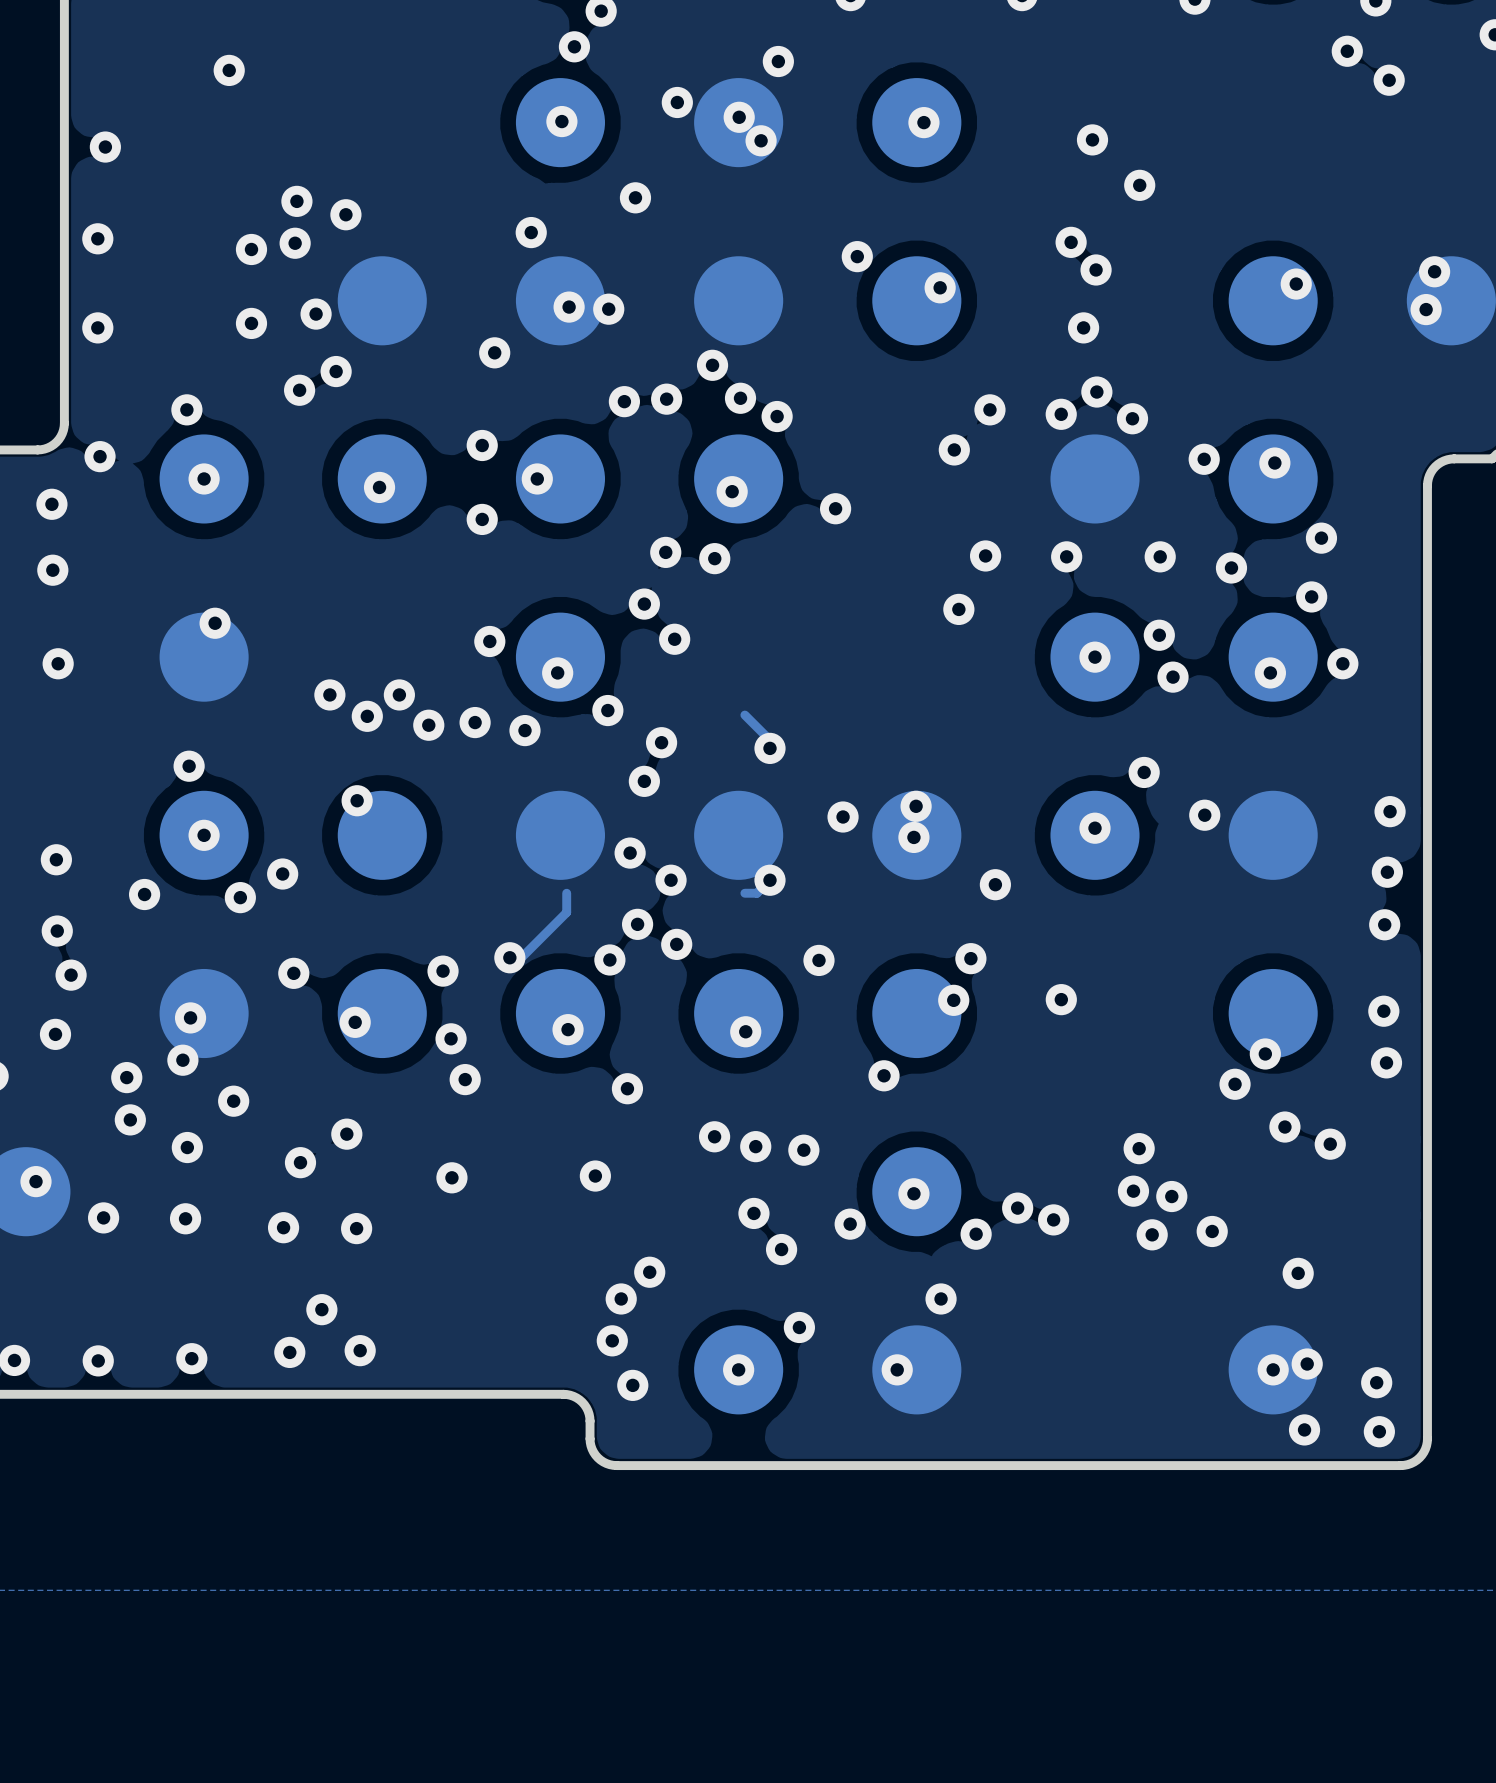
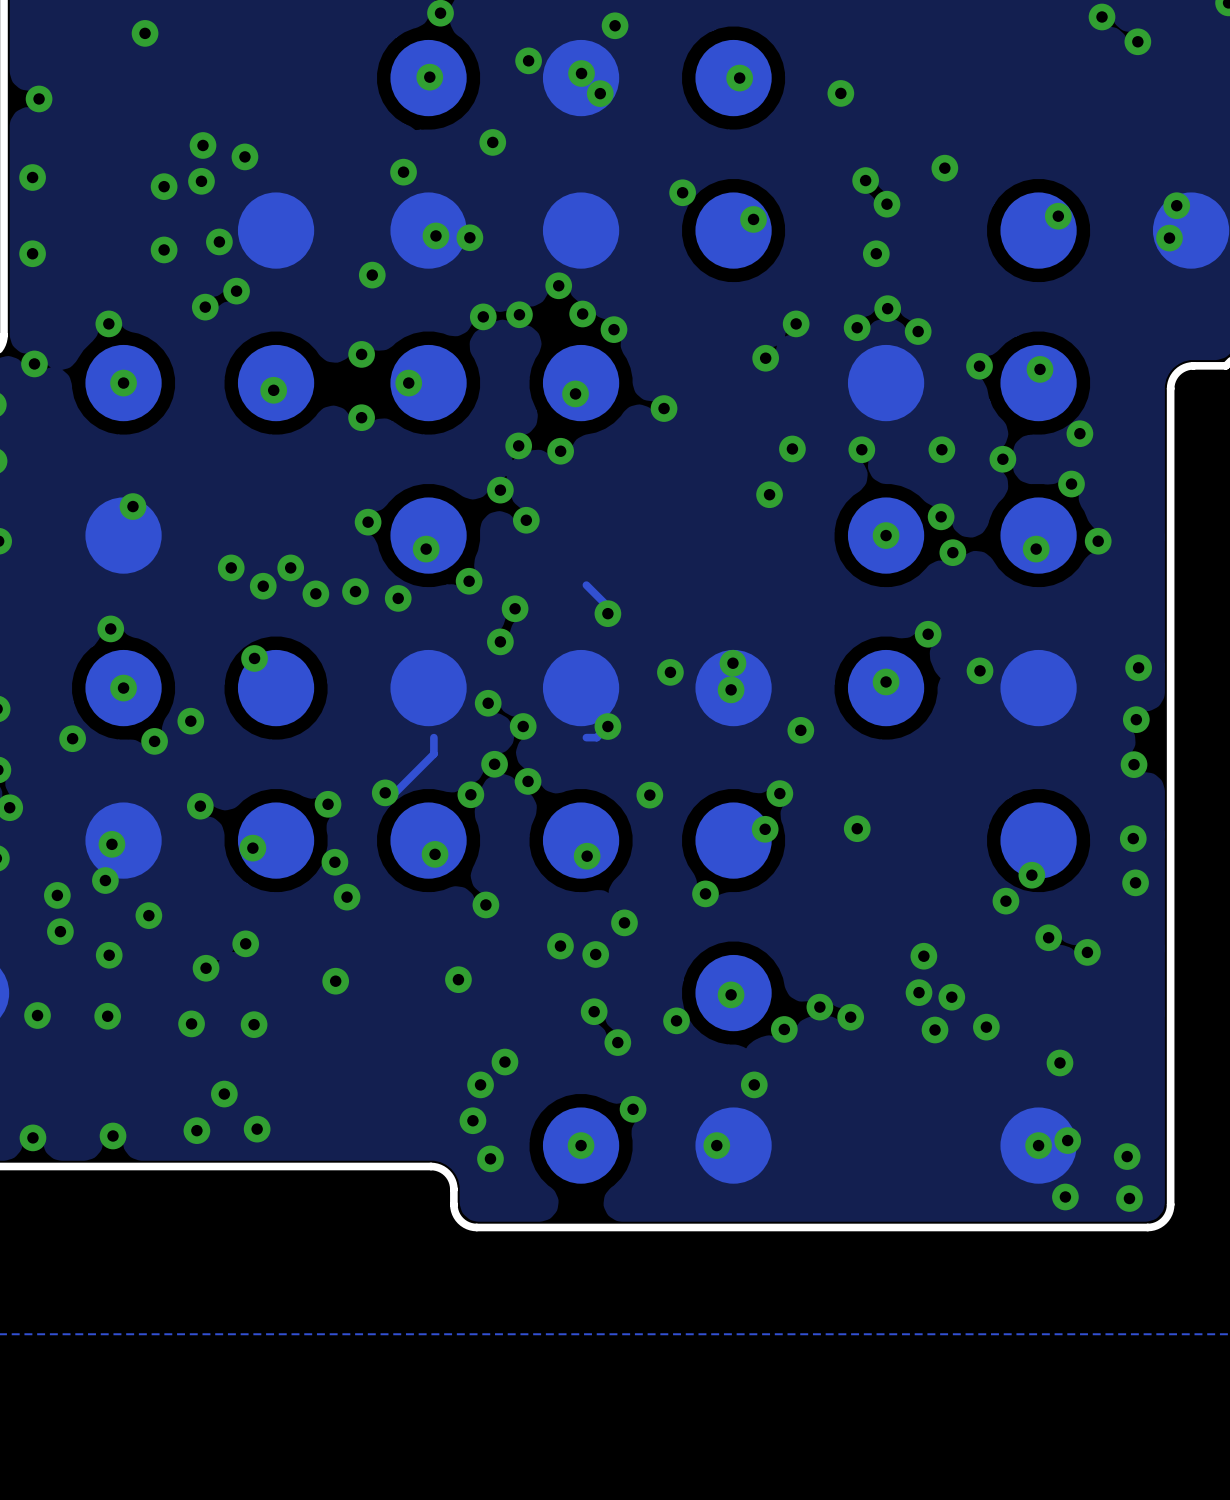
via position: (1092, 139) -> (840, 93)
via position: (1139, 185) -> (944, 168)
via position: (803, 1150) -> (624, 922)

